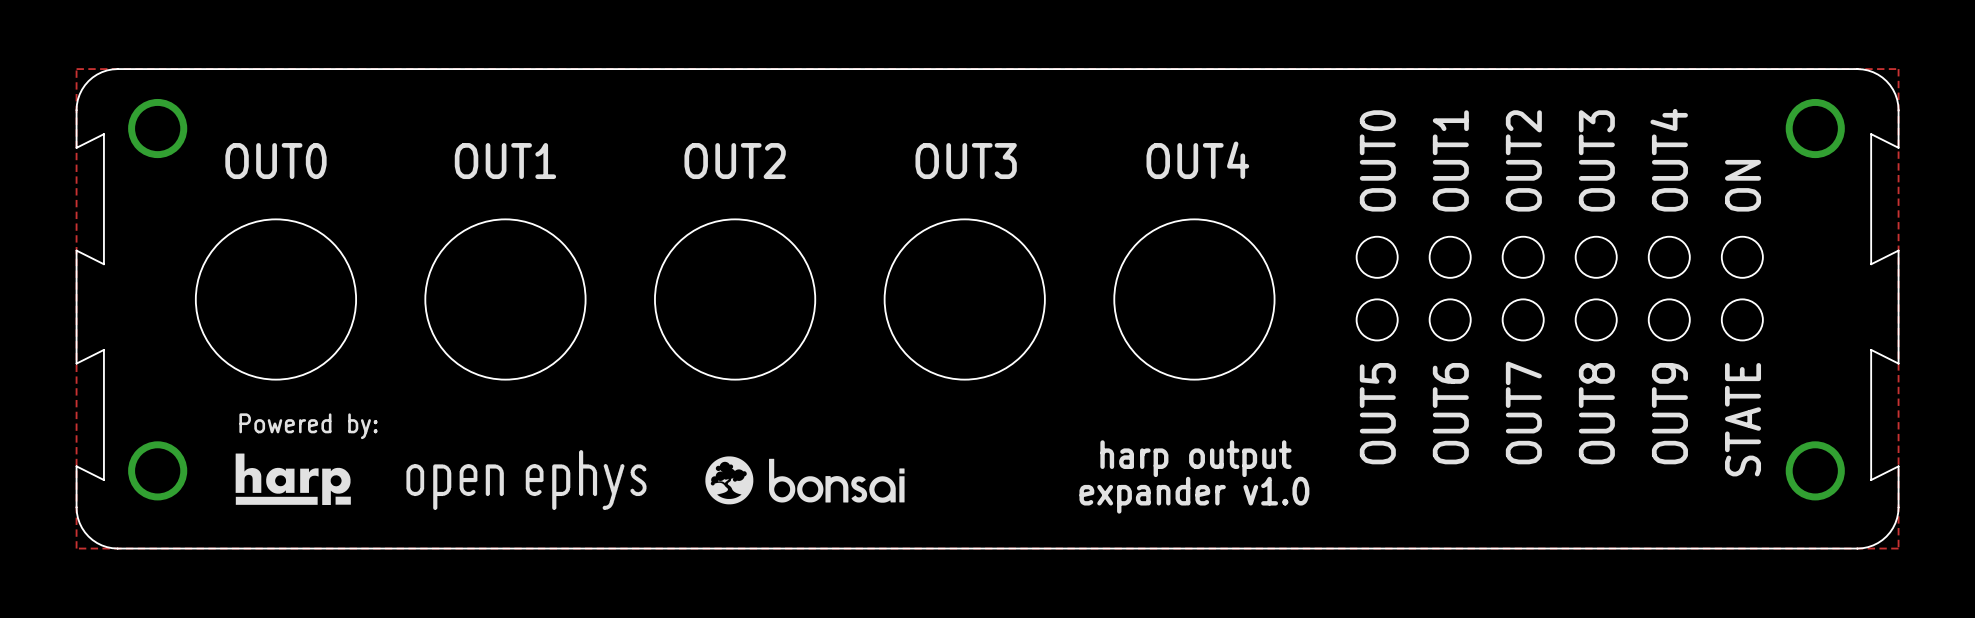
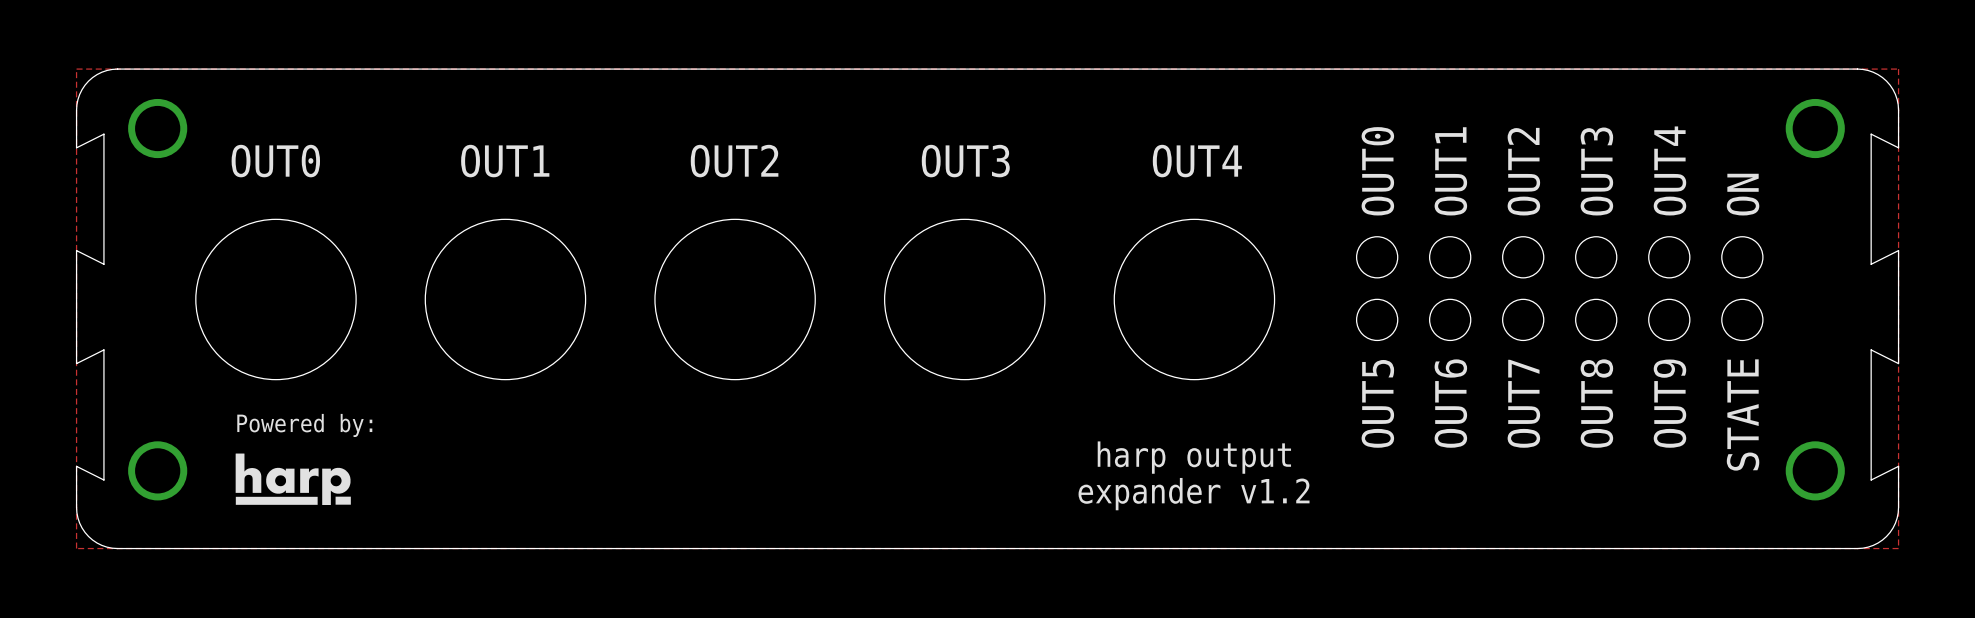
drawing: [406, 450, 647, 510] -> none
drawing: [705, 456, 905, 505] -> none
text: expander v1.0 (1194, 495) -> expander v1.2 (1194, 494)

